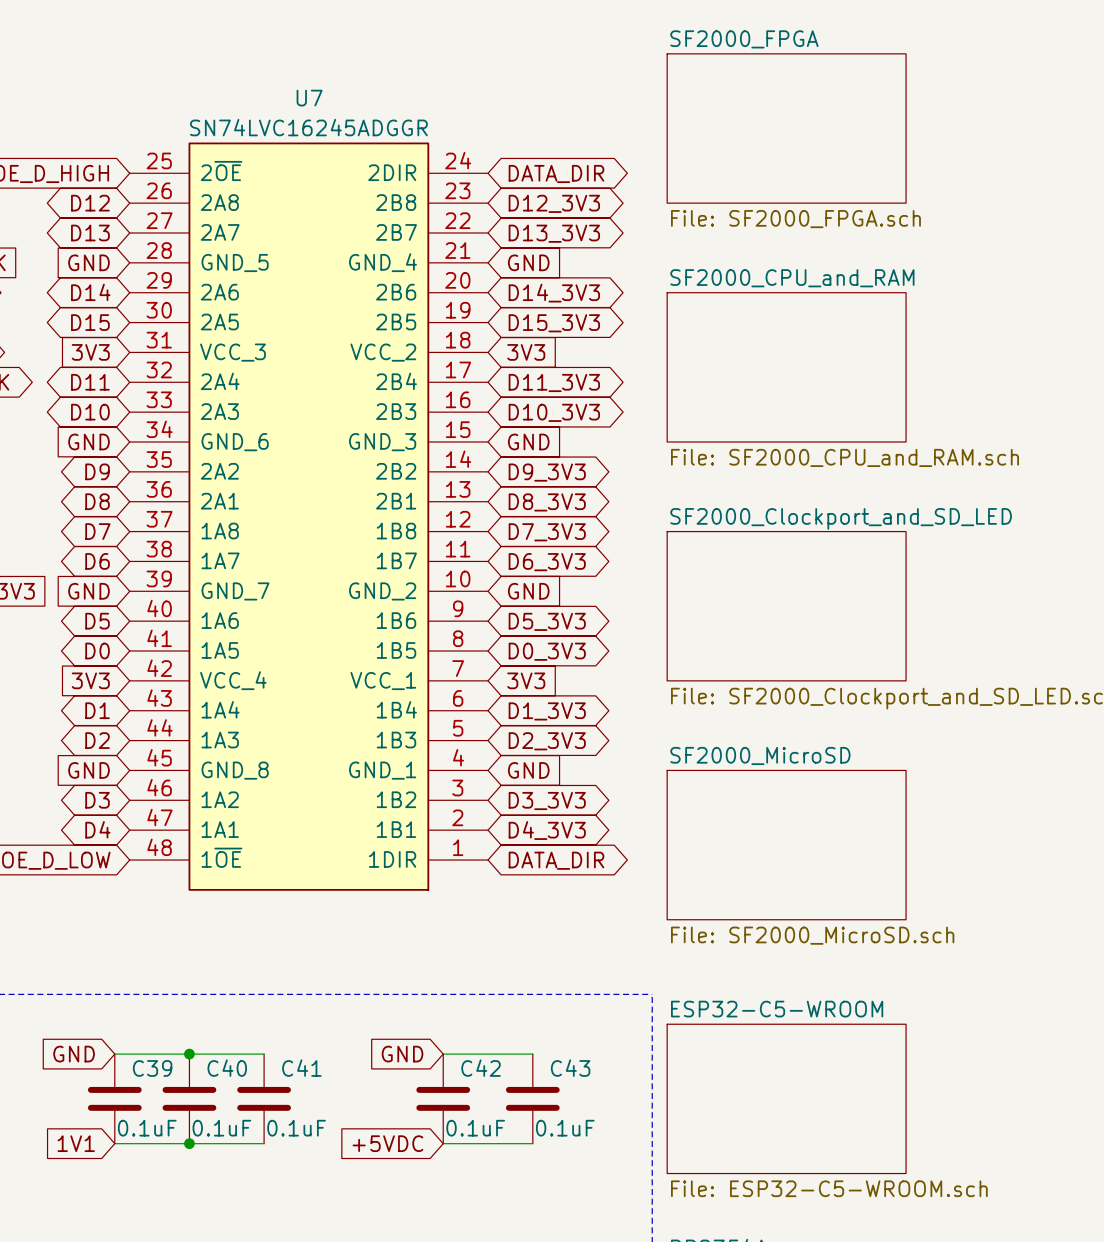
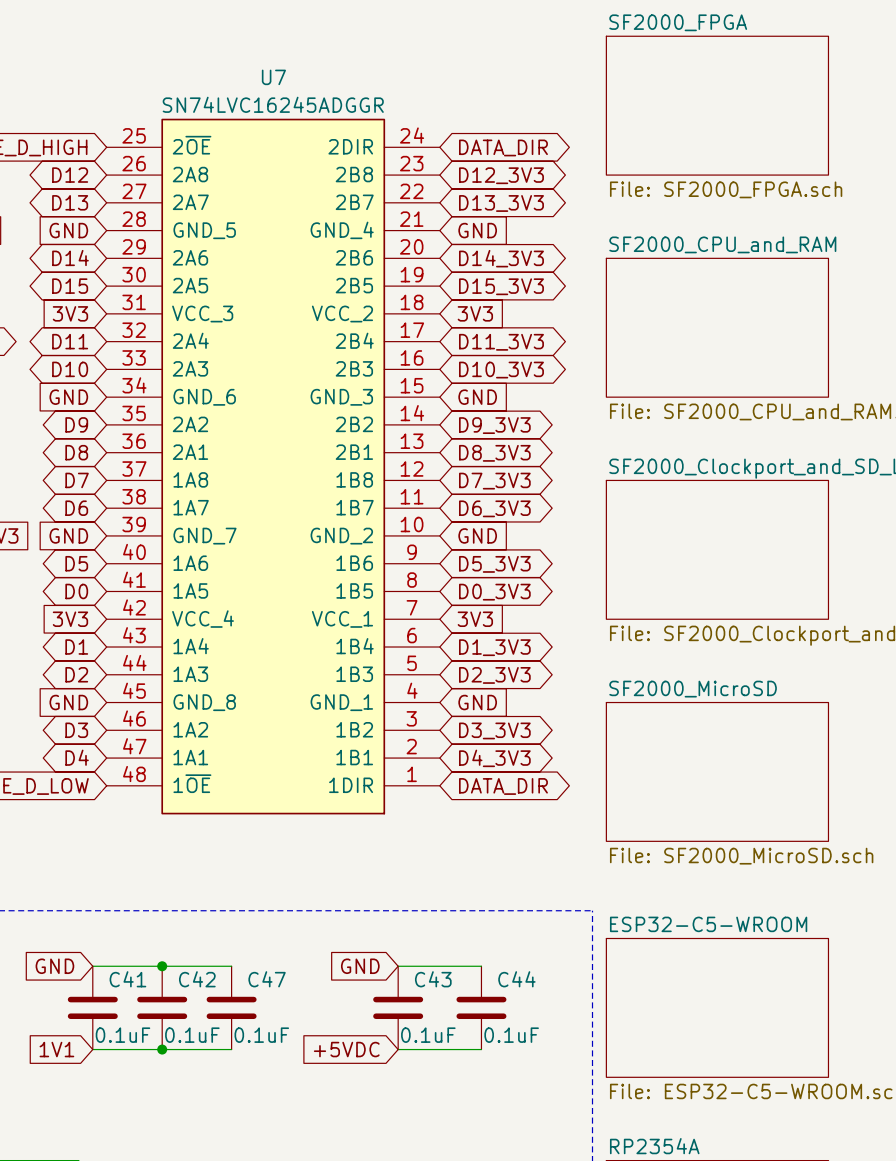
C39 name: C39 (152, 1068) -> C41 (127, 979)
C40 name: C40 (227, 1068) -> C42 (197, 979)
C41 name: C41 (301, 1068) -> C47 (267, 979)
C42 name: C42 (481, 1068) -> C43 (433, 979)
C43 name: C43 (570, 1068) -> C44 (516, 979)

